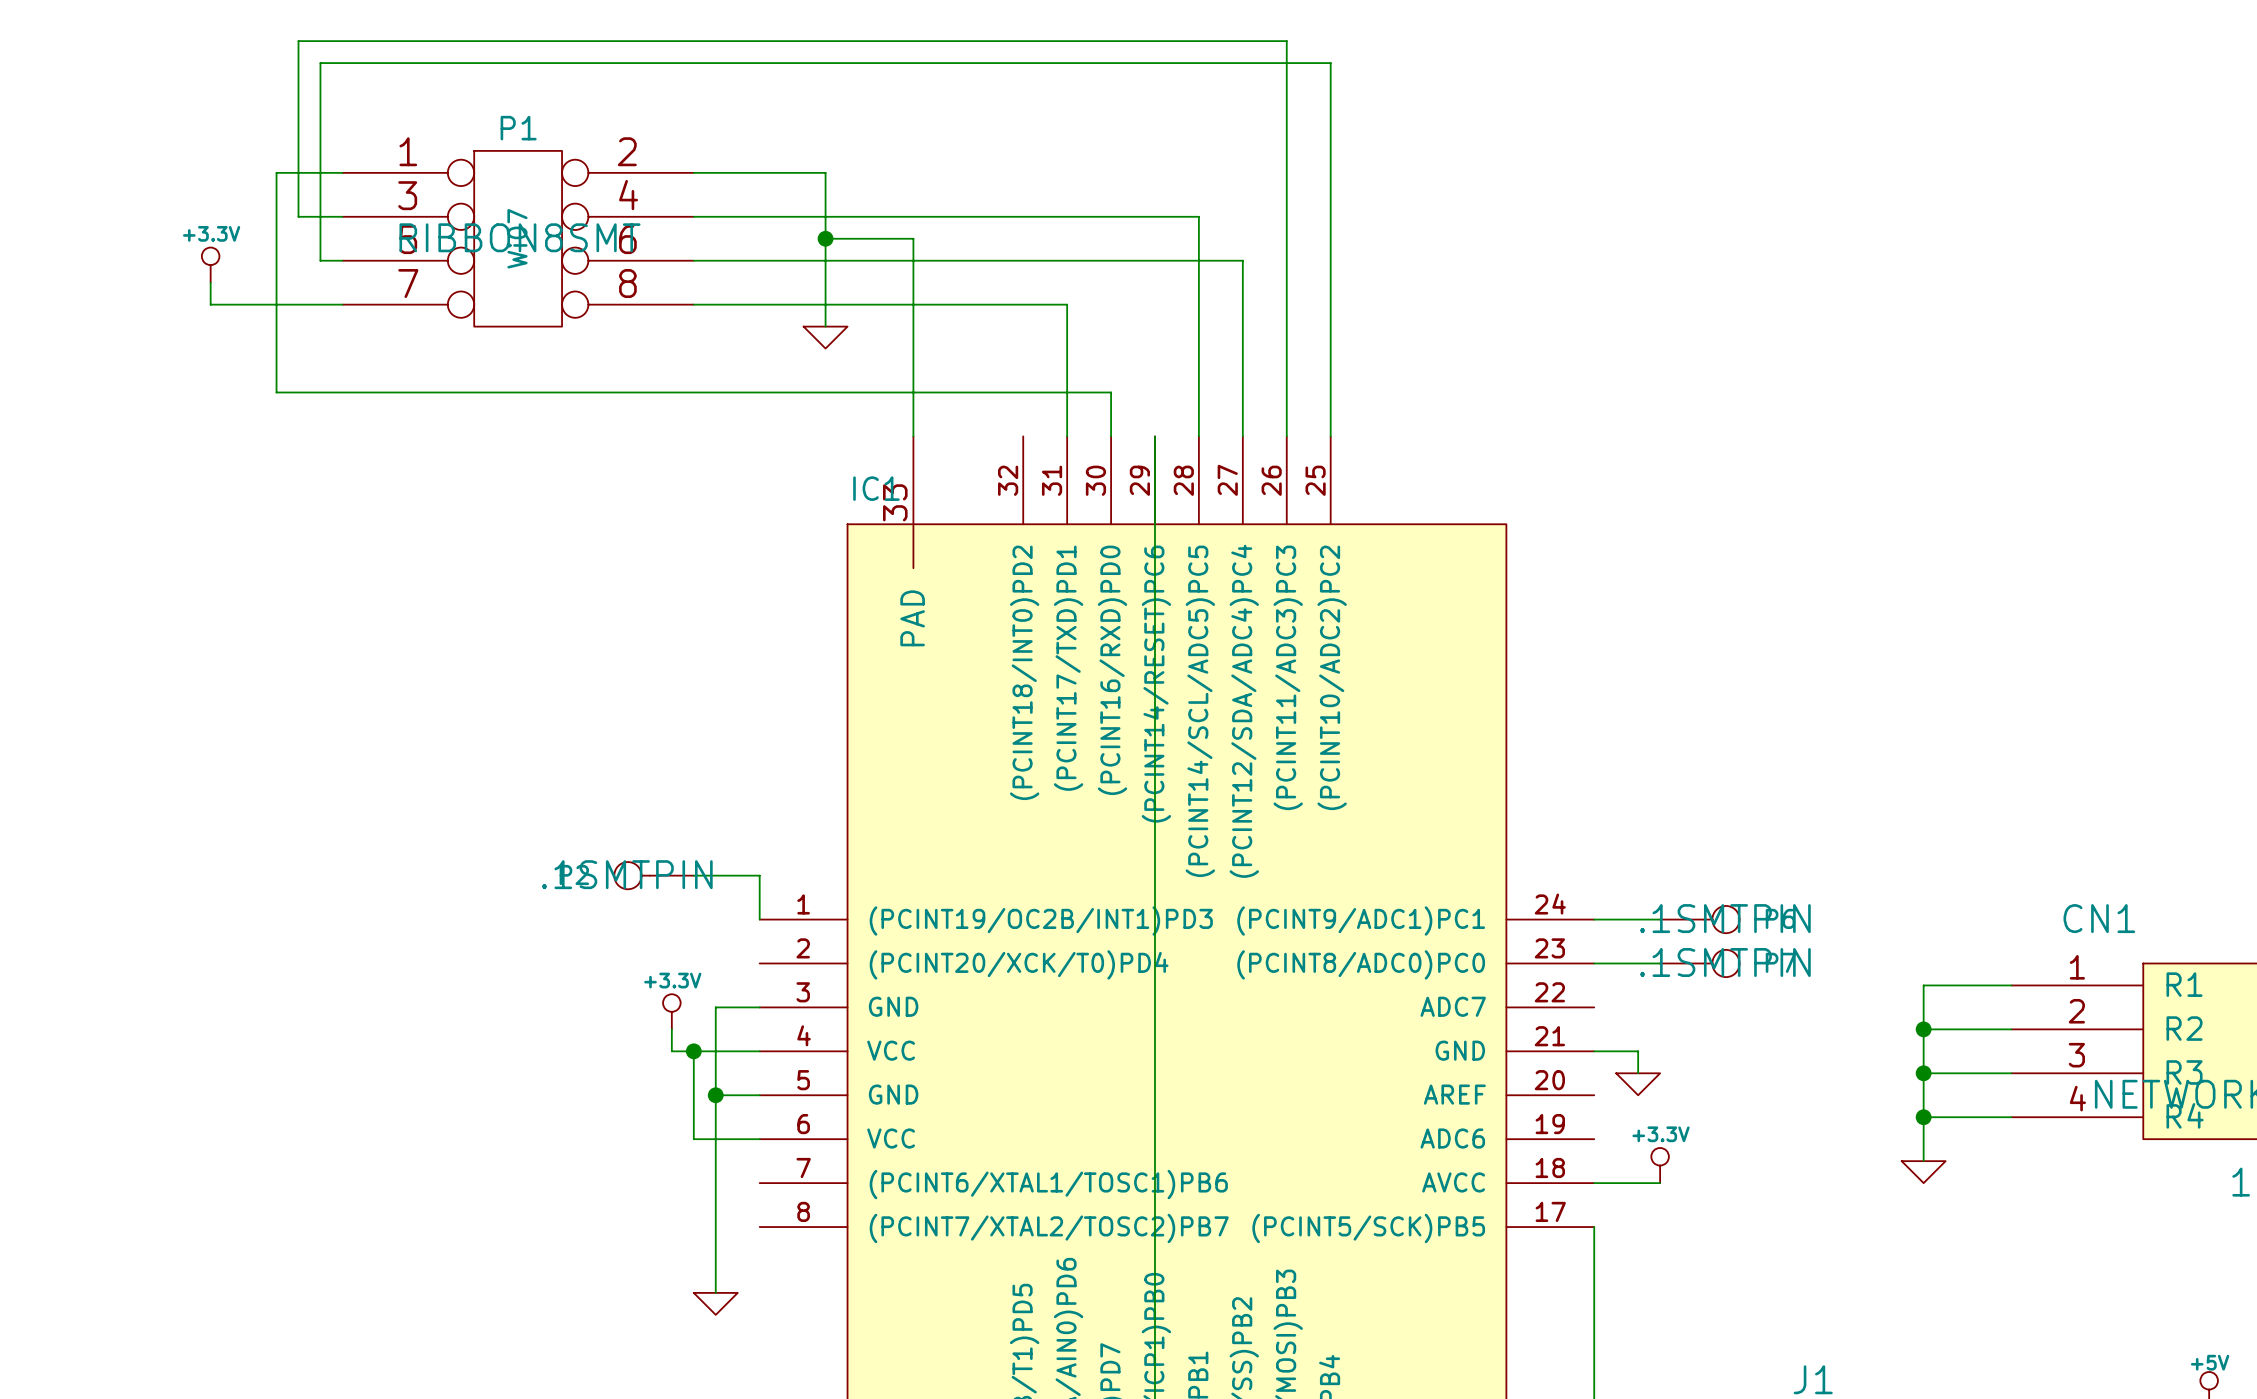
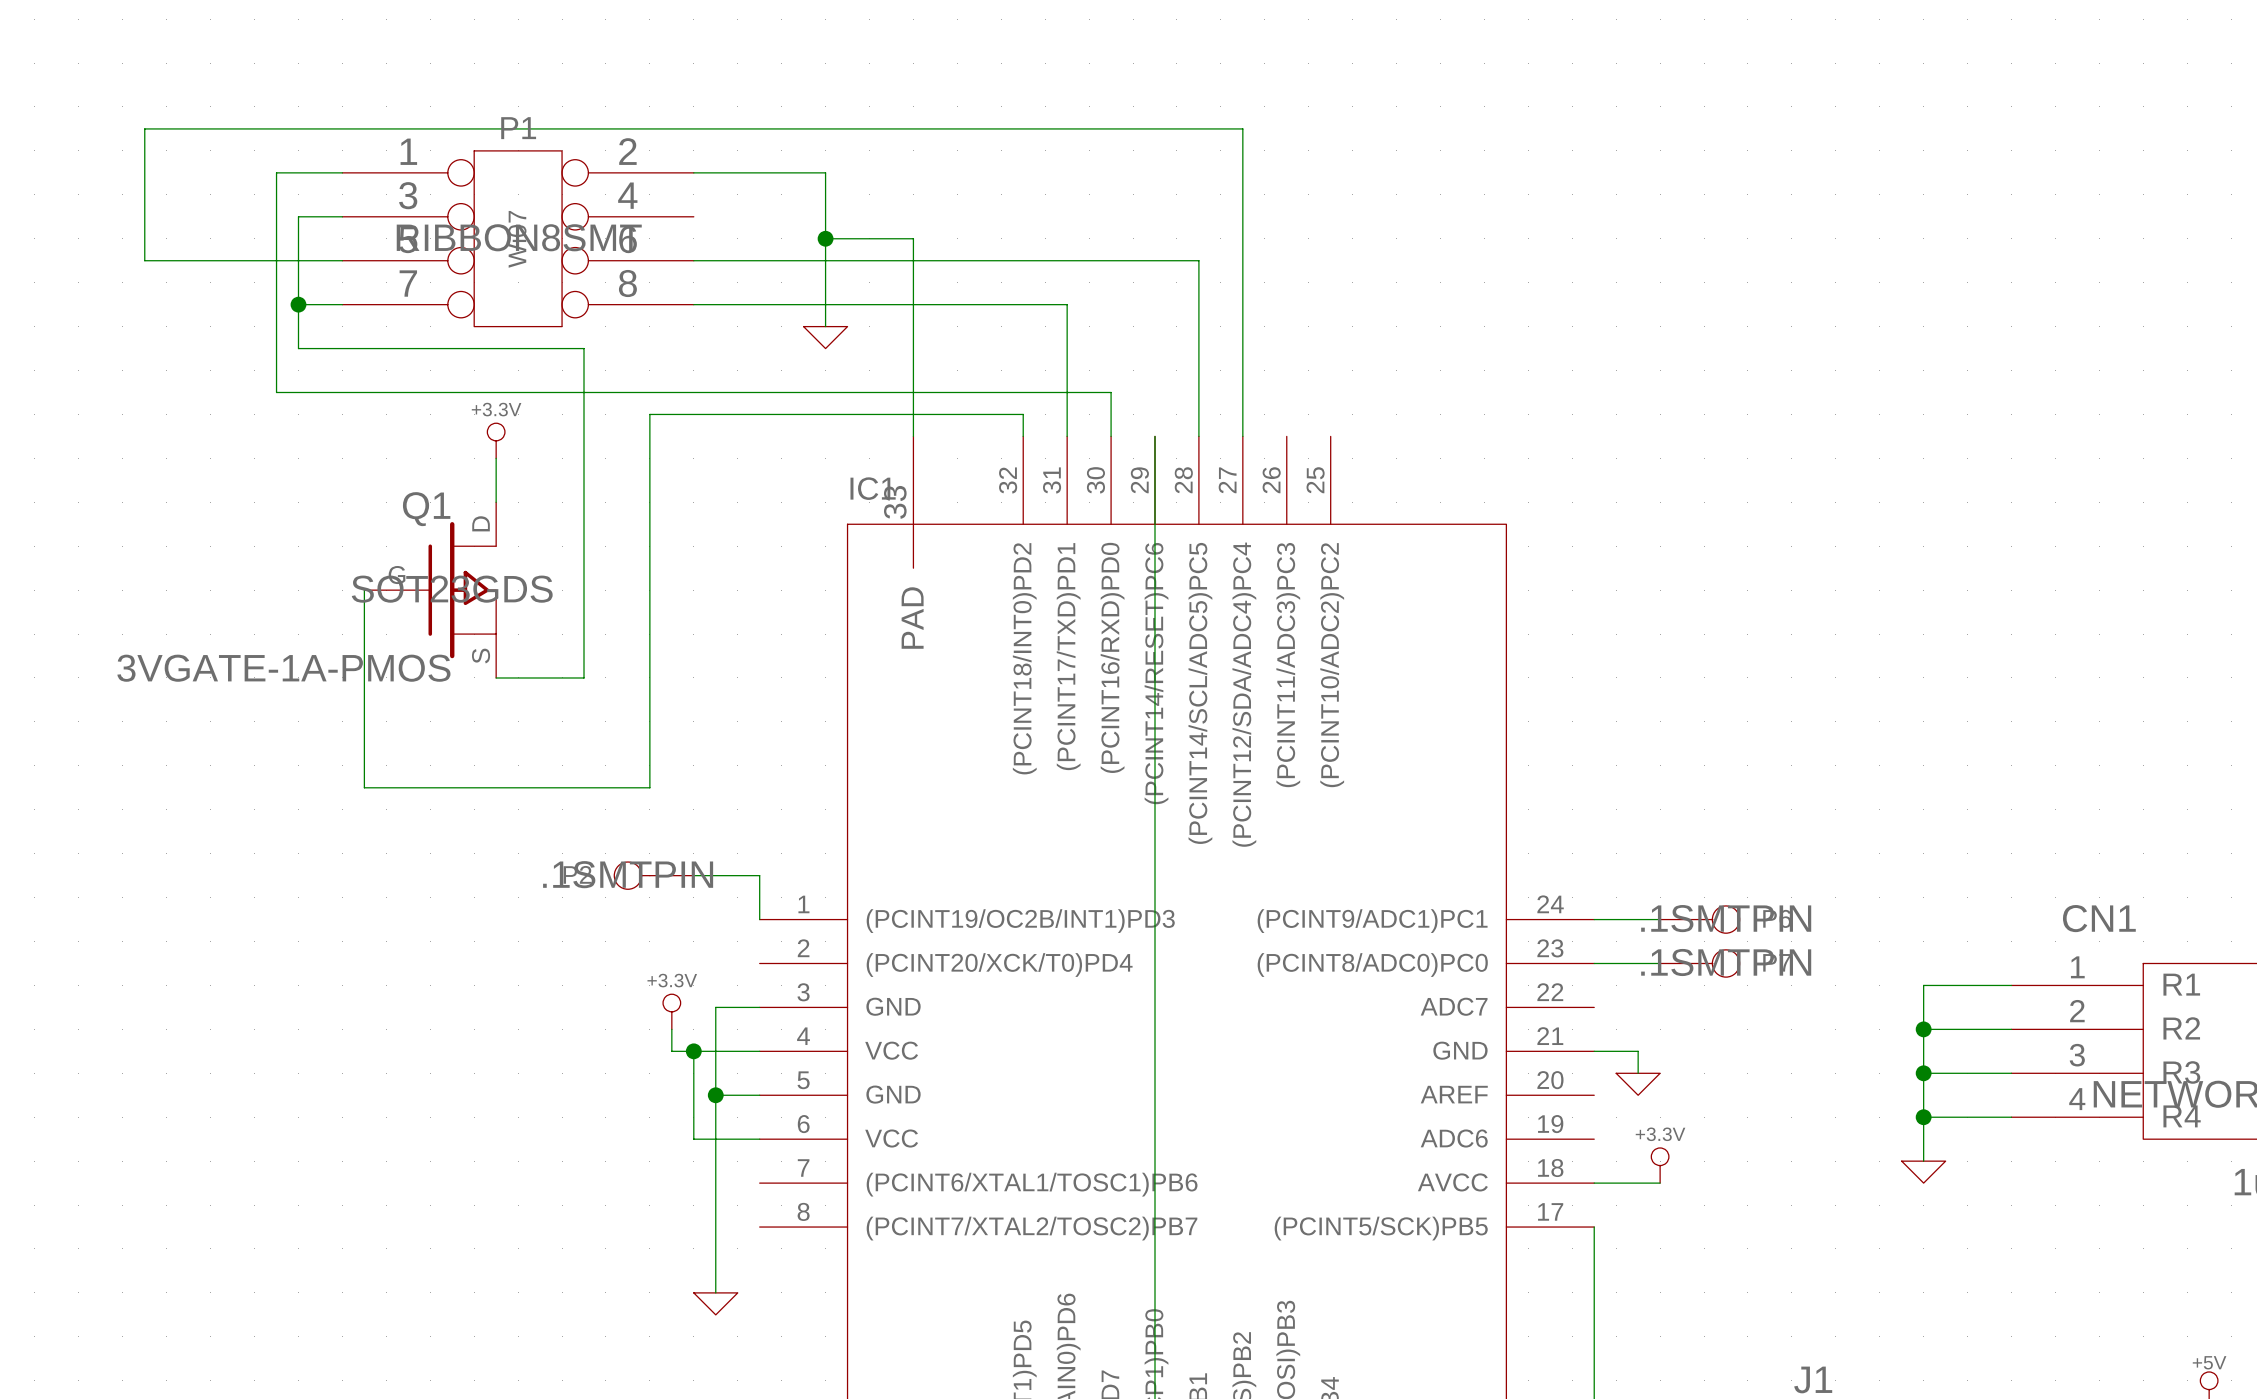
wire: (298, 216) (298, 41) (1286, 41) (1286, 436) -> (298, 216) (298, 348) (583, 348) (583, 677) (496, 677)
wire: (693, 216) (1198, 216) (1198, 260) (1242, 260) -> none
wire: (320, 260) (320, 63) (1330, 63) (1330, 436) -> (320, 260) (144, 260) (144, 128) (1242, 128) (1242, 260)
power symbol position: +3.3V (210, 265) -> +3.3V (496, 440)
wire: (210, 282) (210, 304) (298, 304) -> none
junction: none -> (298, 304)
wire: none -> (1023, 436) (1023, 414) (649, 414) (649, 787) (364, 787) (364, 590)
wire: none -> (496, 458) (496, 502)
Q1: none -> 3VGATE-1A-PMOS (430, 590)

